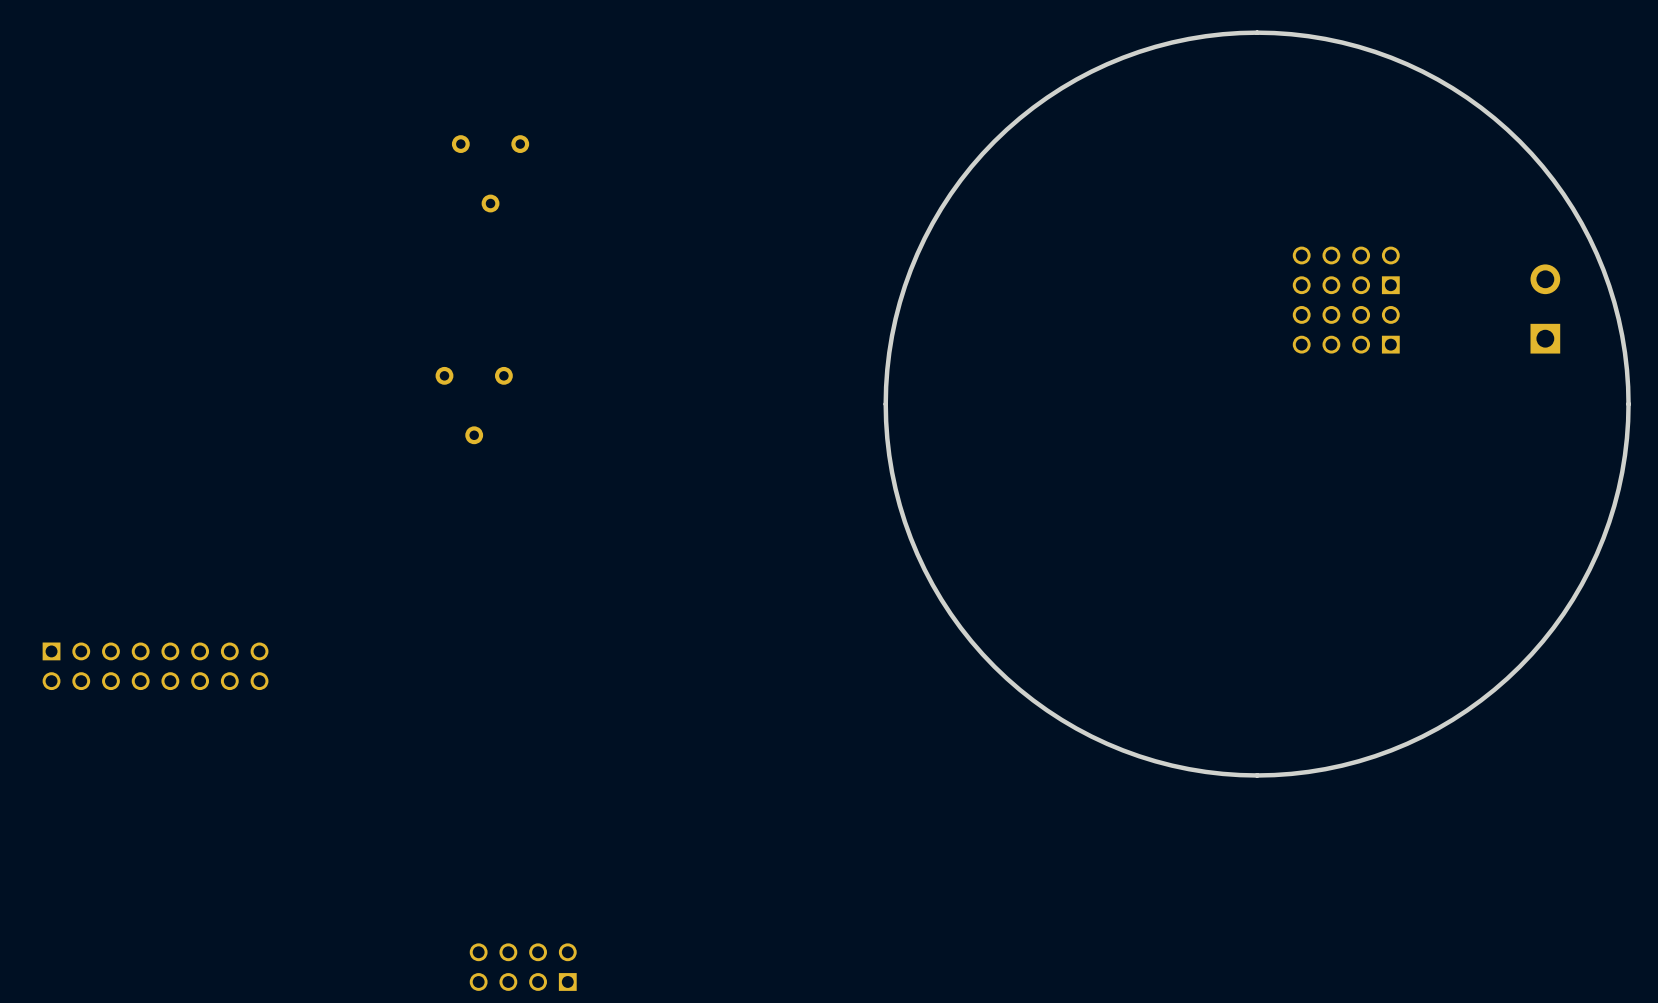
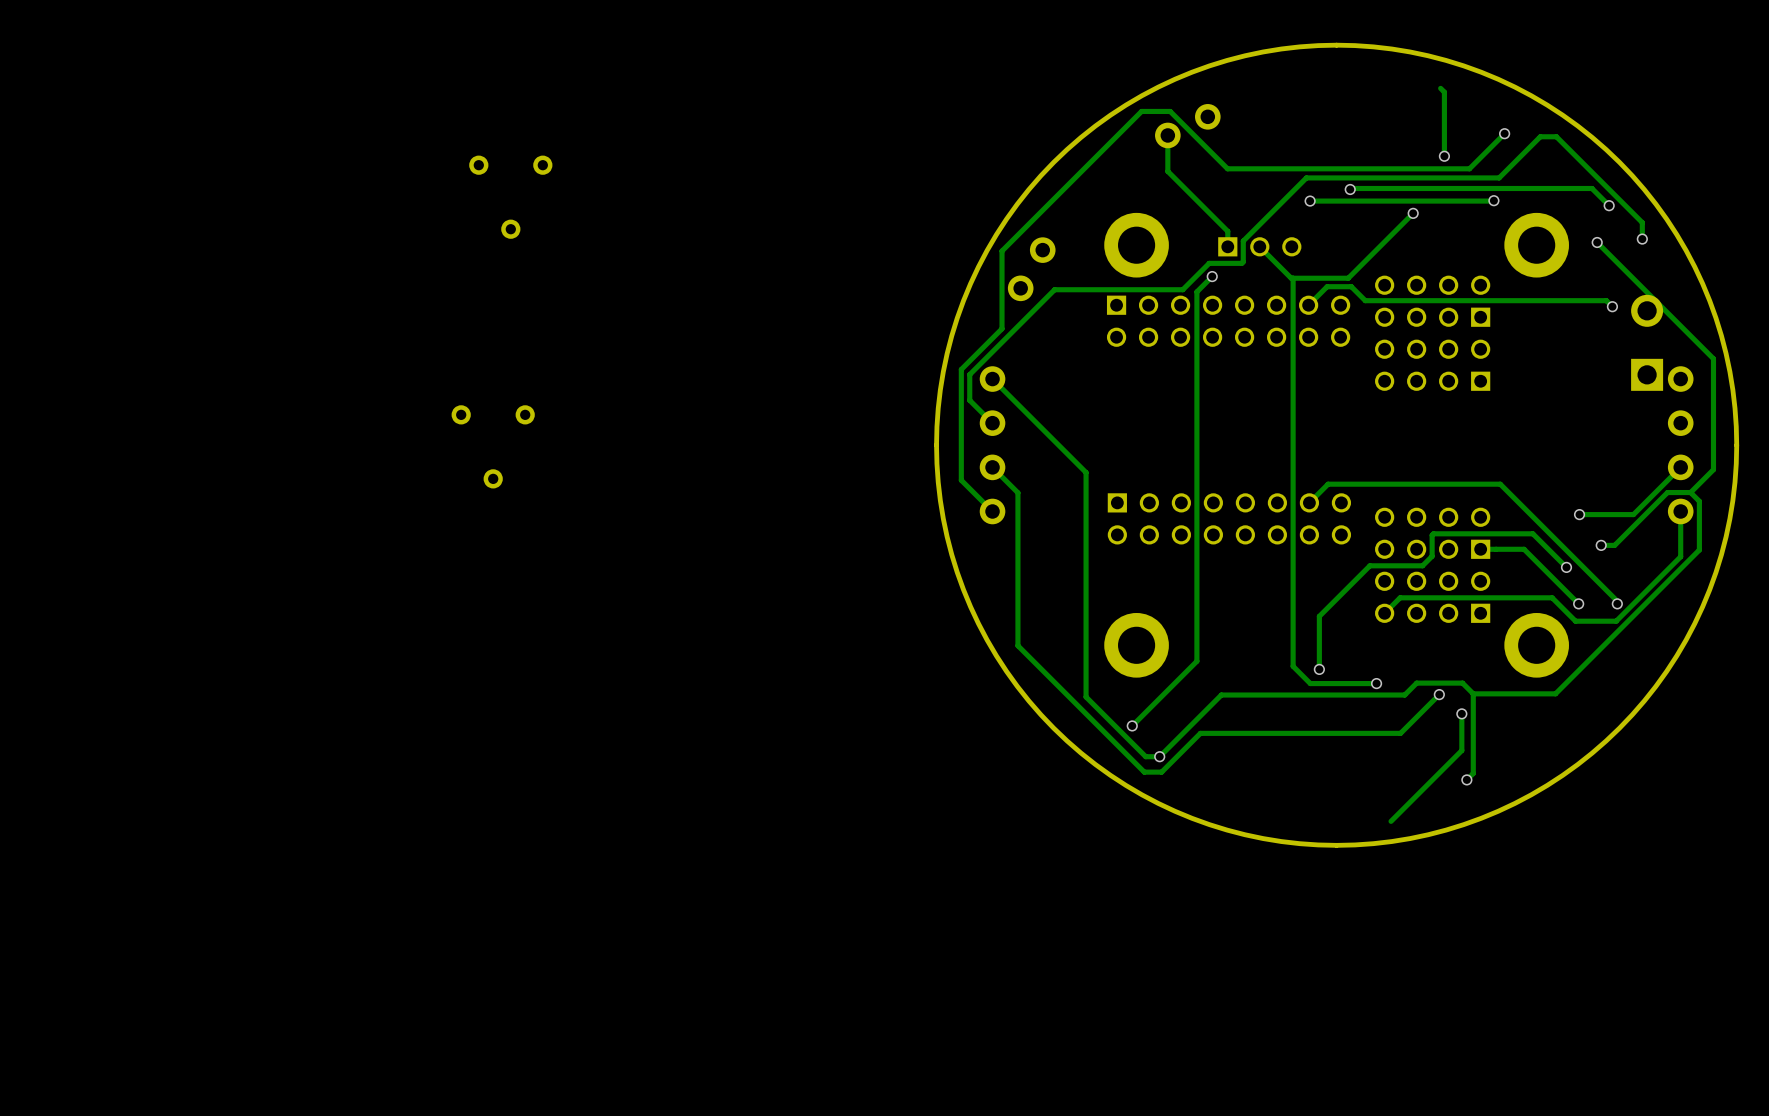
track: none -> (1440, 88) (1444, 92) (1444, 156)
part: none -> (1187, 126)
track: none -> (1504, 133) (1469, 168) (1227, 168) (1170, 111) (1141, 111) (1002, 251) (1002, 328) (961, 369) (961, 480) (992, 511)
via: none -> (1504, 133)
track: none -> (1167, 135) (1167, 171) (1227, 231) (1227, 246)
via: none -> (1444, 156)
track: none -> (1350, 189) (1591, 188) (1609, 205)
via: none -> (1350, 189)
via: none -> (1310, 201)
track: none -> (1493, 200) (1310, 201)
via: none -> (1493, 200)
via: none -> (1609, 205)
track: none -> (1413, 213) (1348, 278) (1291, 278) (1259, 246)
via: none -> (1413, 213)
track: none -> (1642, 239) (1642, 222) (1556, 136) (1540, 136) (1499, 177) (1306, 177) (1243, 241) (1241, 263) (1209, 263) (1182, 289) (1054, 289) (969, 374) (969, 400) (992, 423)
via: none -> (1642, 239)
track: none -> (1597, 242) (1713, 358) (1713, 469) (1690, 492)
via: none -> (1597, 242)
part: none -> (1136, 245)
part: none -> (1536, 245)
part: none -> (1259, 246)
part: none -> (1031, 269)
track: none -> (1212, 276) (1196, 291) (1196, 661) (1132, 725)
via: none -> (1212, 276)
track: none -> (1293, 278) (1293, 666) (1310, 683) (1376, 683)
track: none -> (1308, 305) (1327, 286) (1351, 286) (1365, 300) (1606, 300) (1612, 306)
via: none -> (1612, 306)
part: none -> (1228, 321)
track: none -> (992, 379) (1086, 472) (1086, 697) (1145, 756) (1159, 756) (1221, 695) (1404, 695) (1416, 683) (1462, 683) (1473, 693)
part: none -> (992, 401)
part: none -> (1680, 401)
track: none -> (992, 467) (1017, 492) (1017, 645) (1144, 772) (1161, 772) (1200, 733) (1400, 733) (1439, 694)
track: none -> (1680, 467) (1633, 514) (1579, 514)
part: none -> (992, 489)
part: none -> (1680, 489)
track: none -> (1690, 492) (1667, 492) (1614, 545) (1601, 545)
track: none -> (1690, 492) (1699, 501) (1699, 549) (1555, 693) (1473, 693)
track: none -> (1309, 502) (1328, 484) (1500, 484) (1617, 601) (1617, 603)
track: none -> (1680, 511) (1680, 556) (1616, 621) (1575, 621) (1552, 597) (1400, 597) (1384, 613)
via: none -> (1579, 514)
part: none -> (1229, 518)
part: none -> (1432, 533)
via: none -> (1601, 545)
track: none -> (1480, 549) (1524, 549) (1578, 603)
track: none -> (1566, 567) (1532, 533) (1433, 533) (1432, 556) (1422, 565) (1369, 565) (1319, 616) (1319, 669)
via: none -> (1566, 567)
part: none -> (1432, 597)
via: none -> (1578, 603)
via: none -> (1617, 603)
part: none -> (1136, 645)
part: none -> (1536, 645)
via: none -> (1319, 669)
via: none -> (1376, 683)
track: none -> (1473, 693) (1473, 773) (1466, 779)
via: none -> (1439, 694)
track: none -> (1461, 713) (1461, 750) (1391, 821)
via: none -> (1461, 713)
via: none -> (1132, 725)
part: (155, 666) -> none
via: none -> (1159, 756)
via: none -> (1466, 779)
part: (523, 967) -> none

